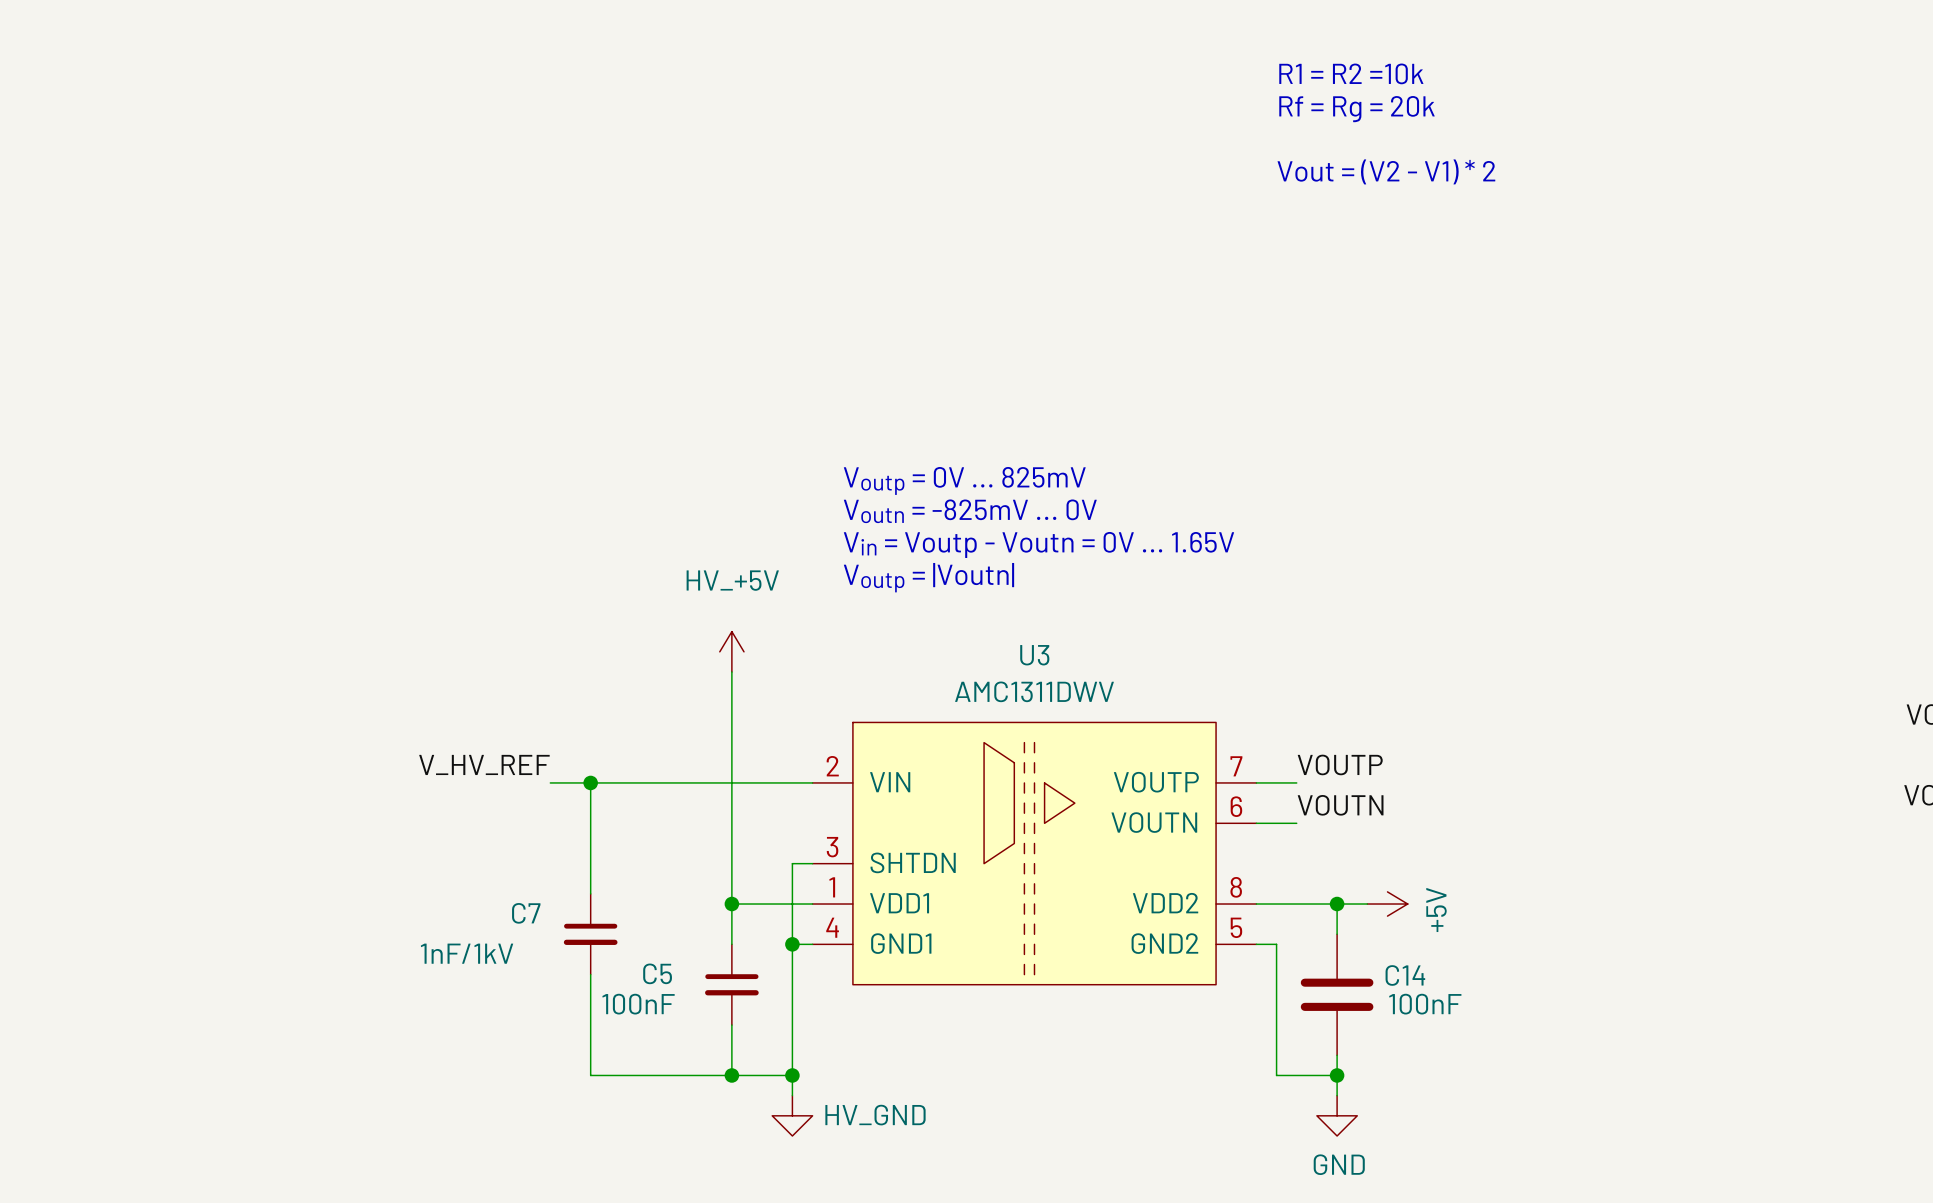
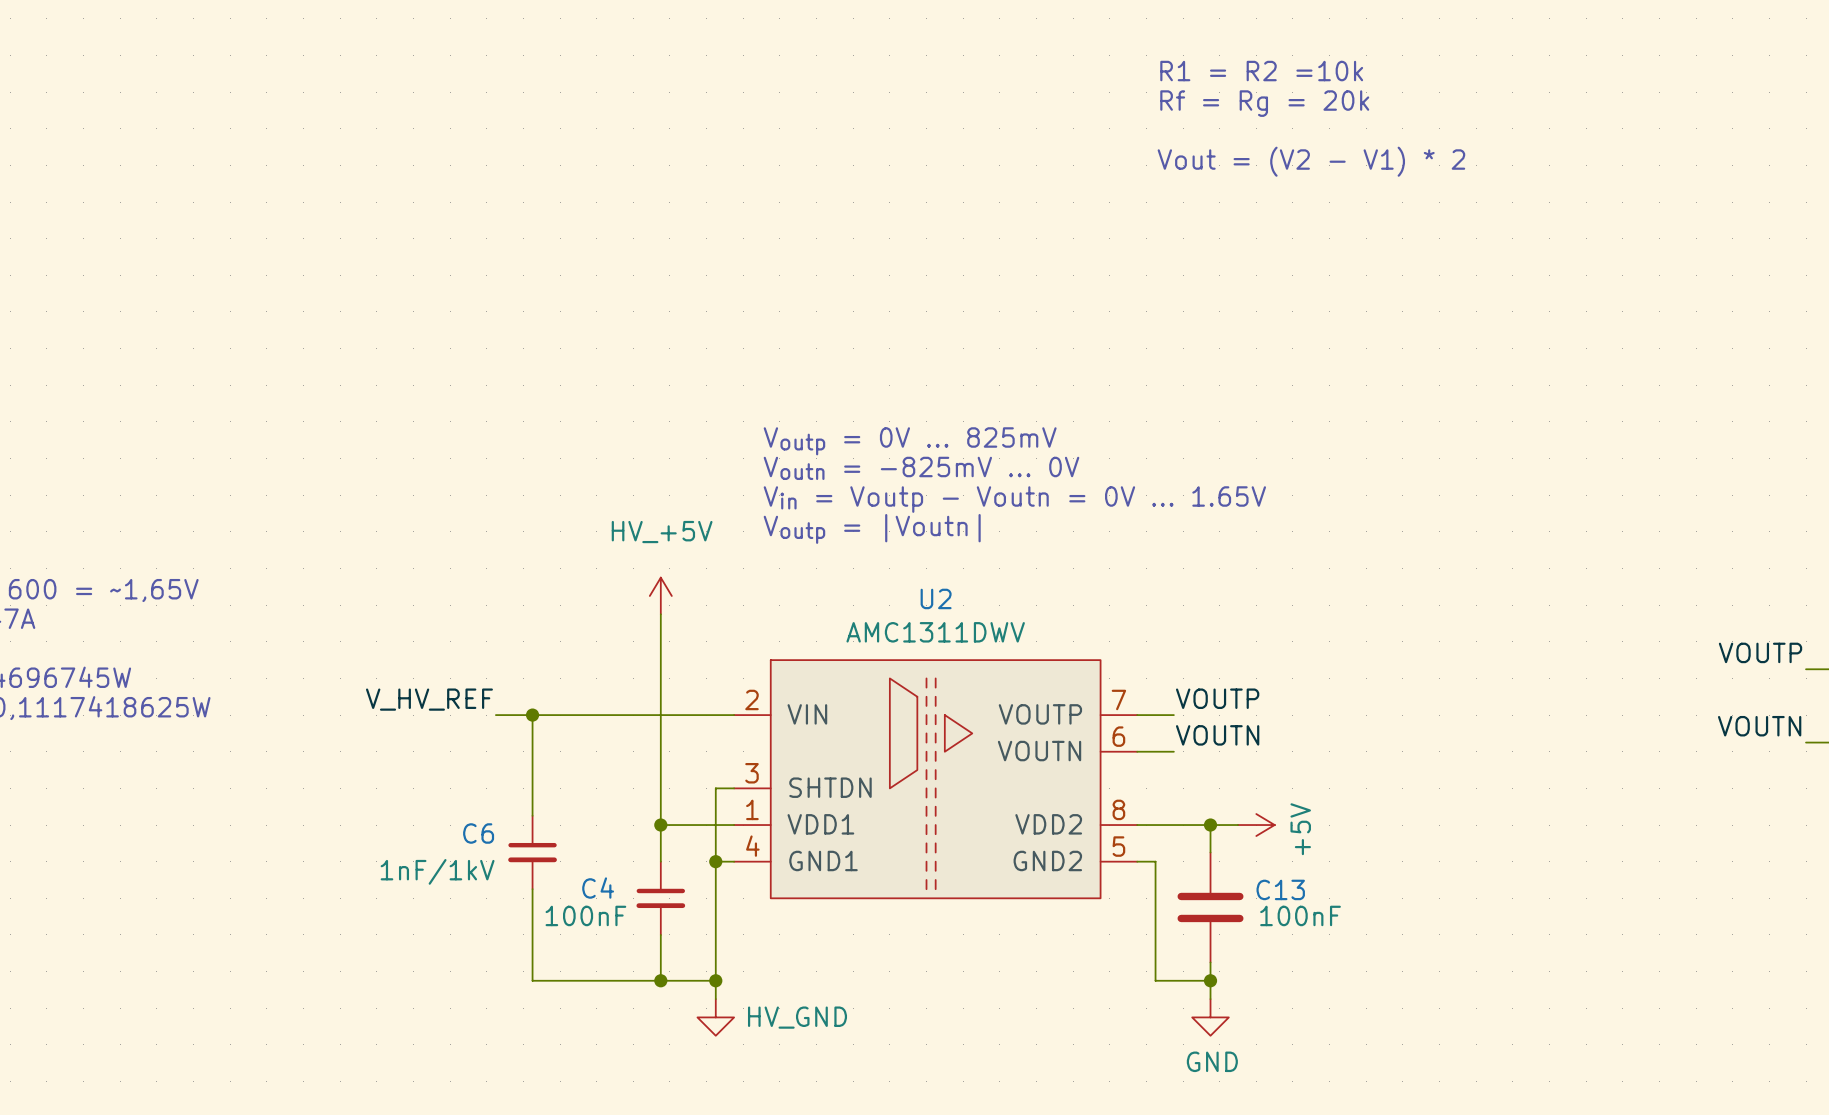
U3 name: U3 (1034, 655) -> U2 (936, 598)
C7 name: C7 (526, 913) -> C6 (478, 833)
C5 name: C5 (657, 973) -> C4 (598, 888)
C14 name: C14 (1405, 975) -> C13 (1280, 889)

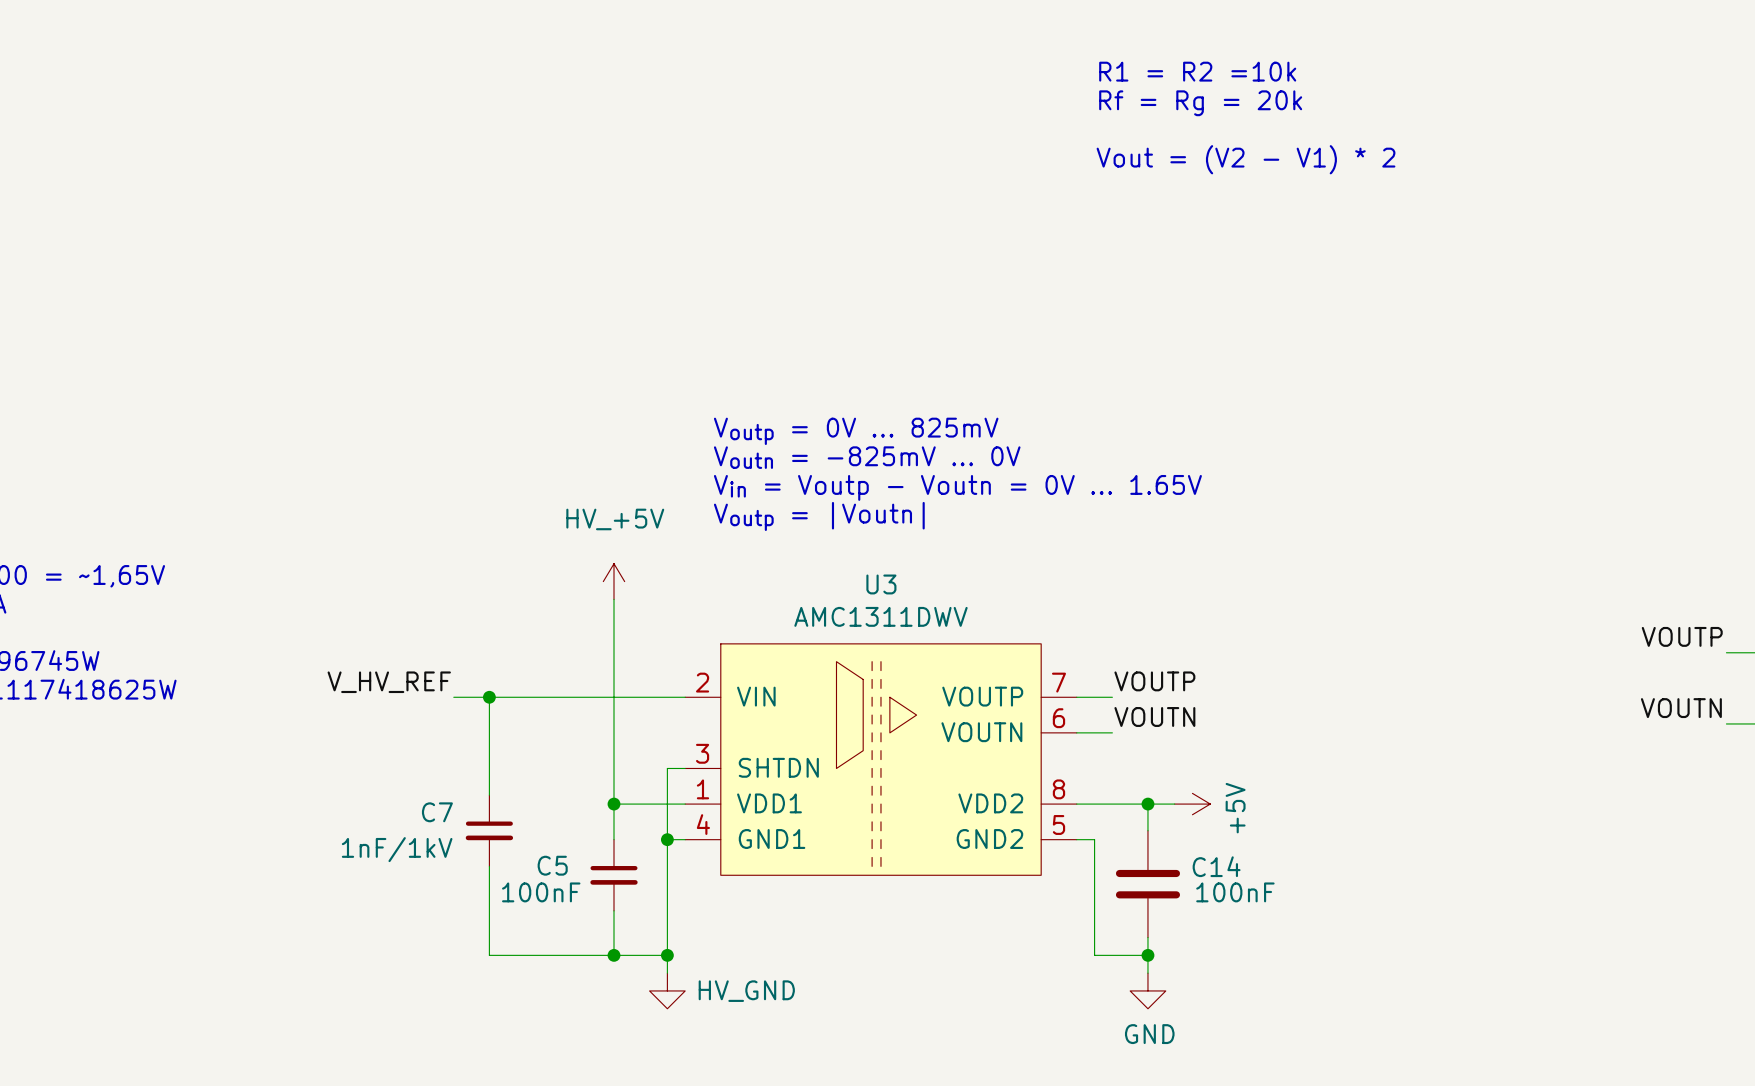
U2 name: U2 (936, 598) -> U3 (881, 584)
C6 name: C6 (478, 833) -> C7 (437, 812)
C4 name: C4 (598, 888) -> C5 (552, 865)
C13 name: C13 (1280, 889) -> C14 (1216, 866)

